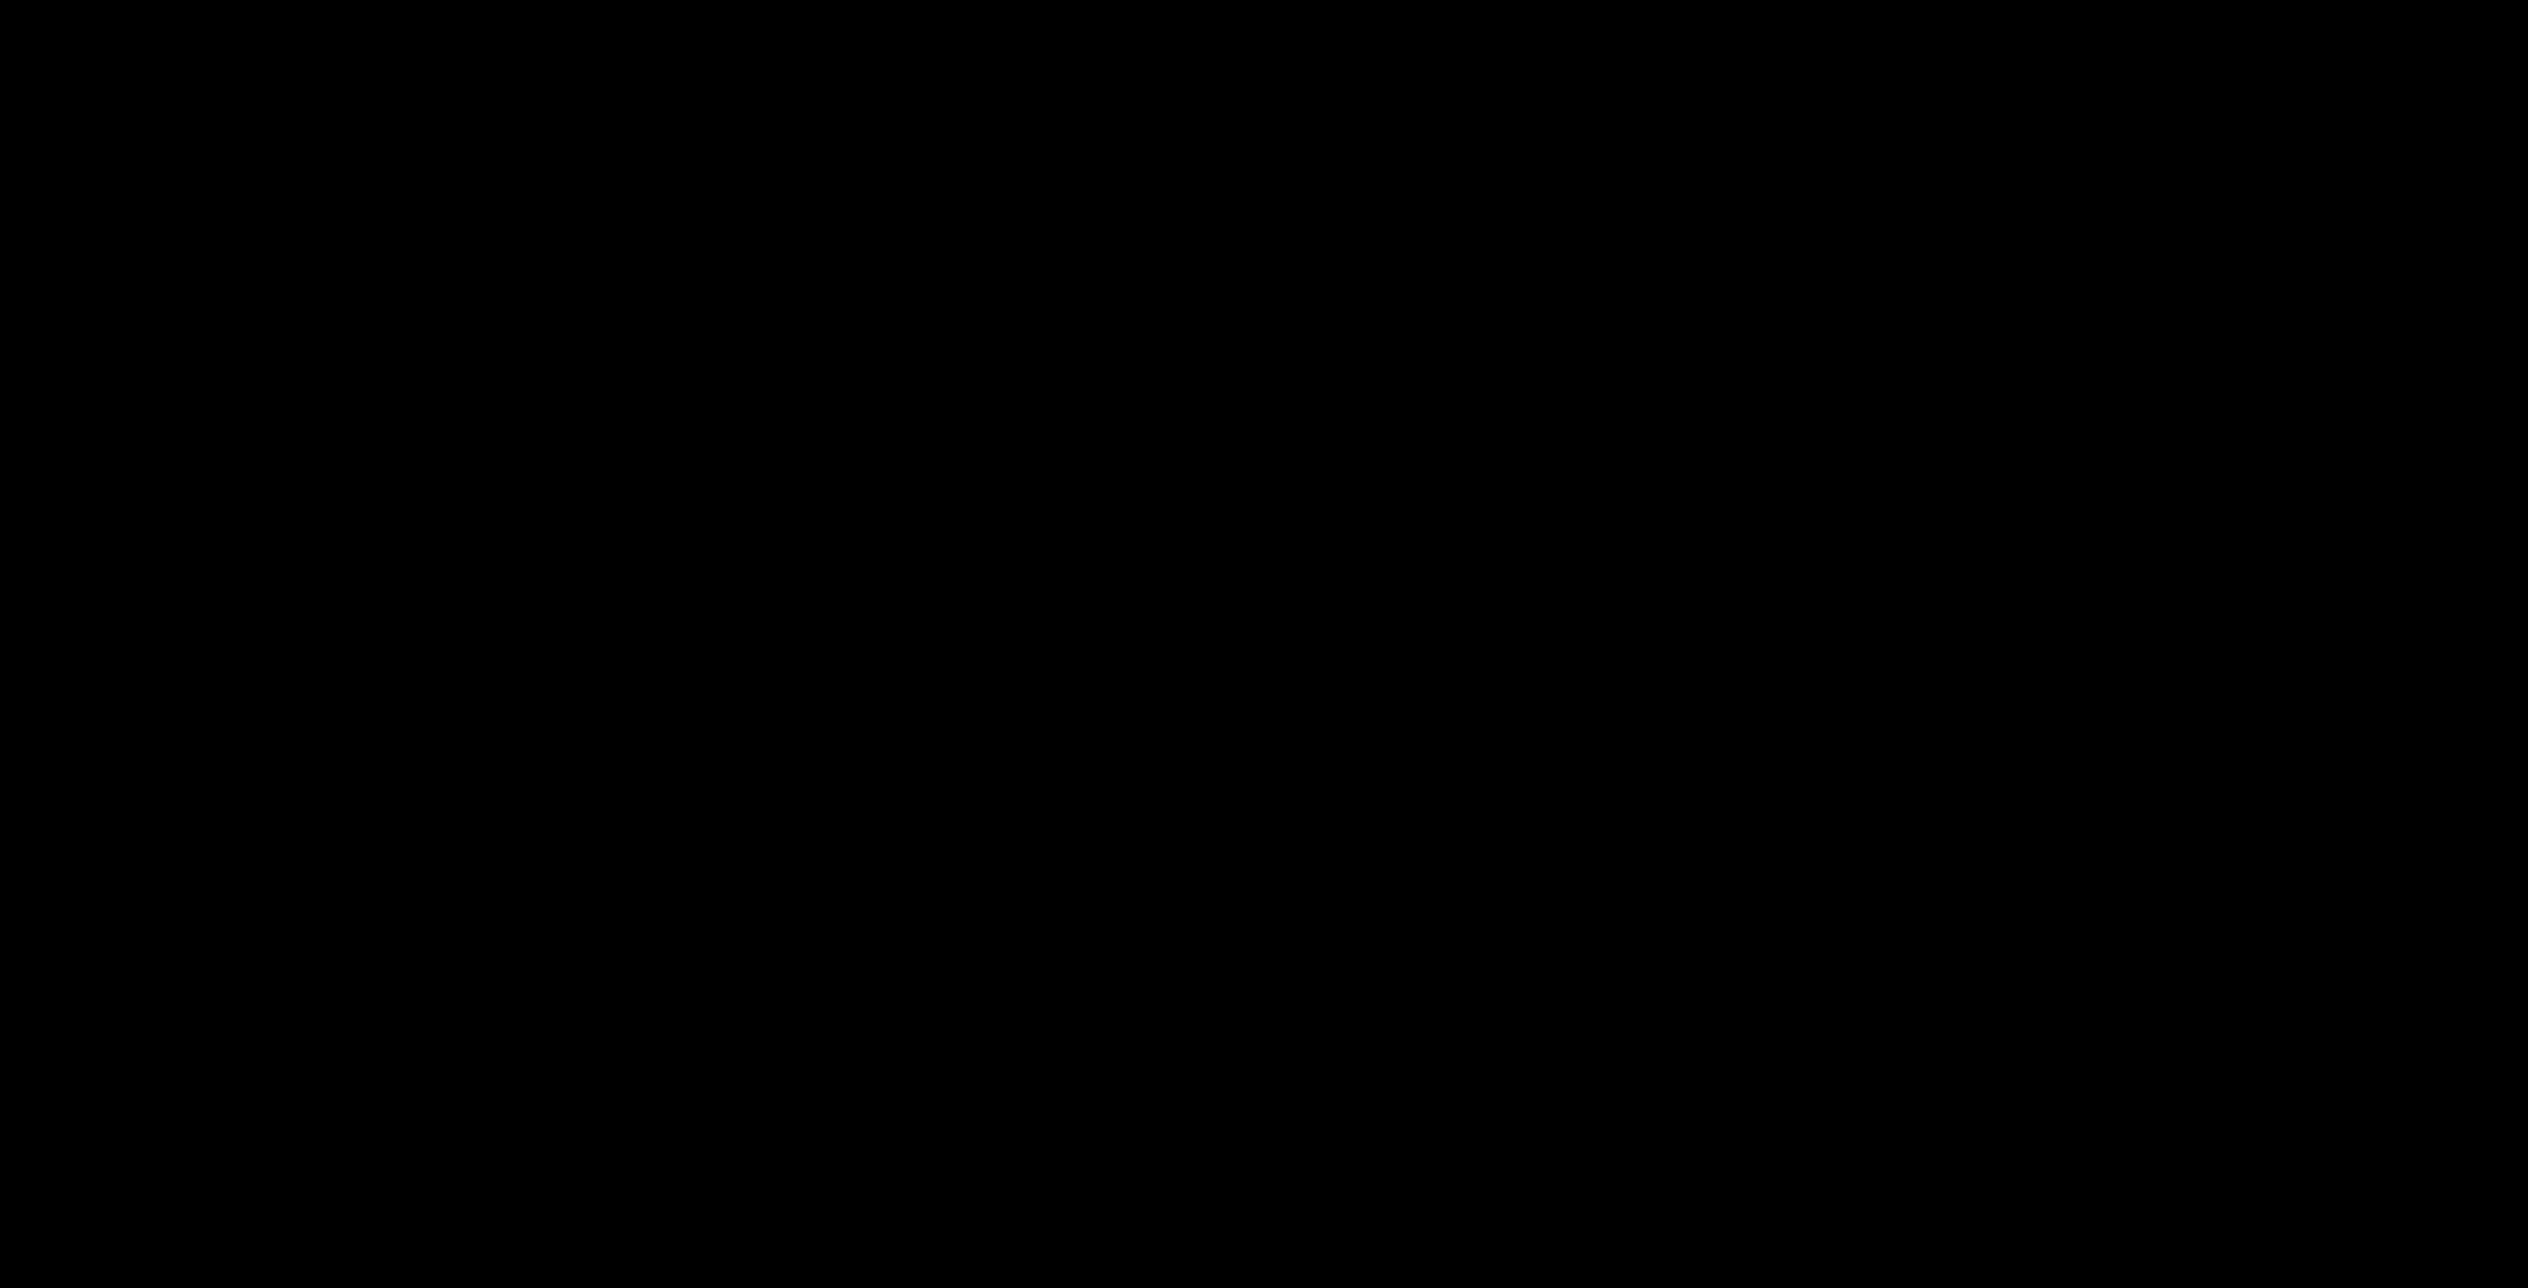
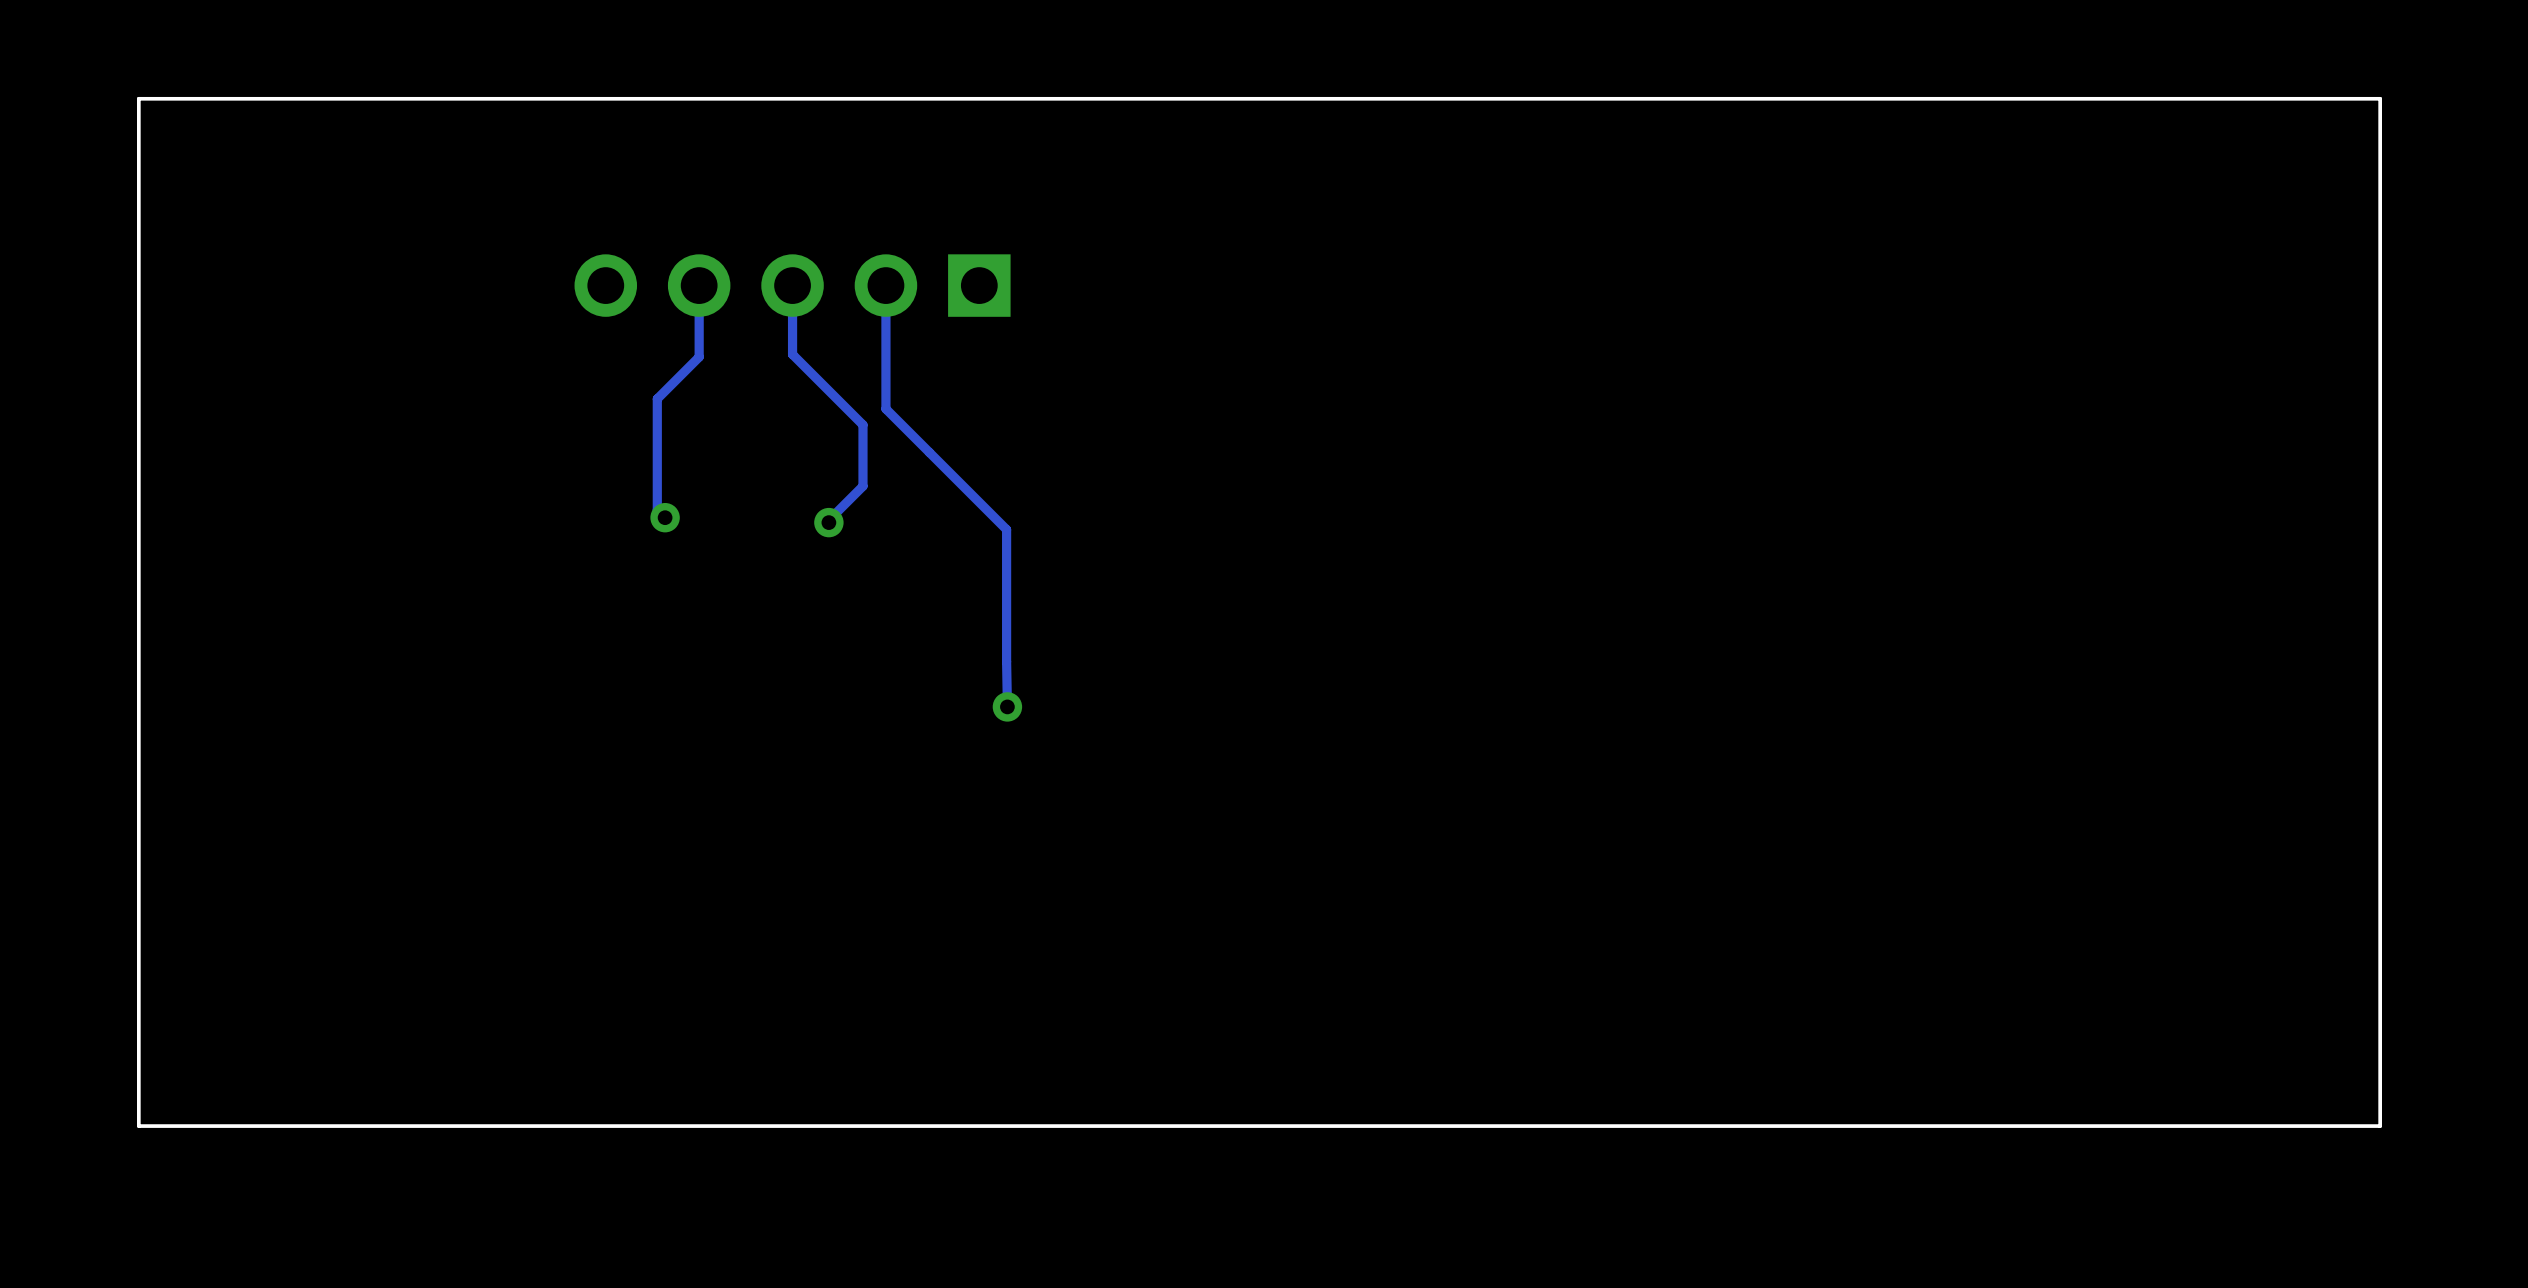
board edge: none -> (2380, 98) (2380, 1126) (138, 1126) (138, 98) (2380, 98)
track: none -> (699, 285) (699, 357) (657, 398) (657, 509) (667, 520)
track: none -> (792, 285) (792, 354) (862, 424) (862, 486) (828, 520) (828, 522) (826, 522)
part: none -> (792, 285)
track: none -> (885, 285) (885, 408) (1006, 529) (1006, 707) (1008, 709)
via: none -> (665, 517)
via: none -> (828, 522)
via: none -> (1007, 706)

